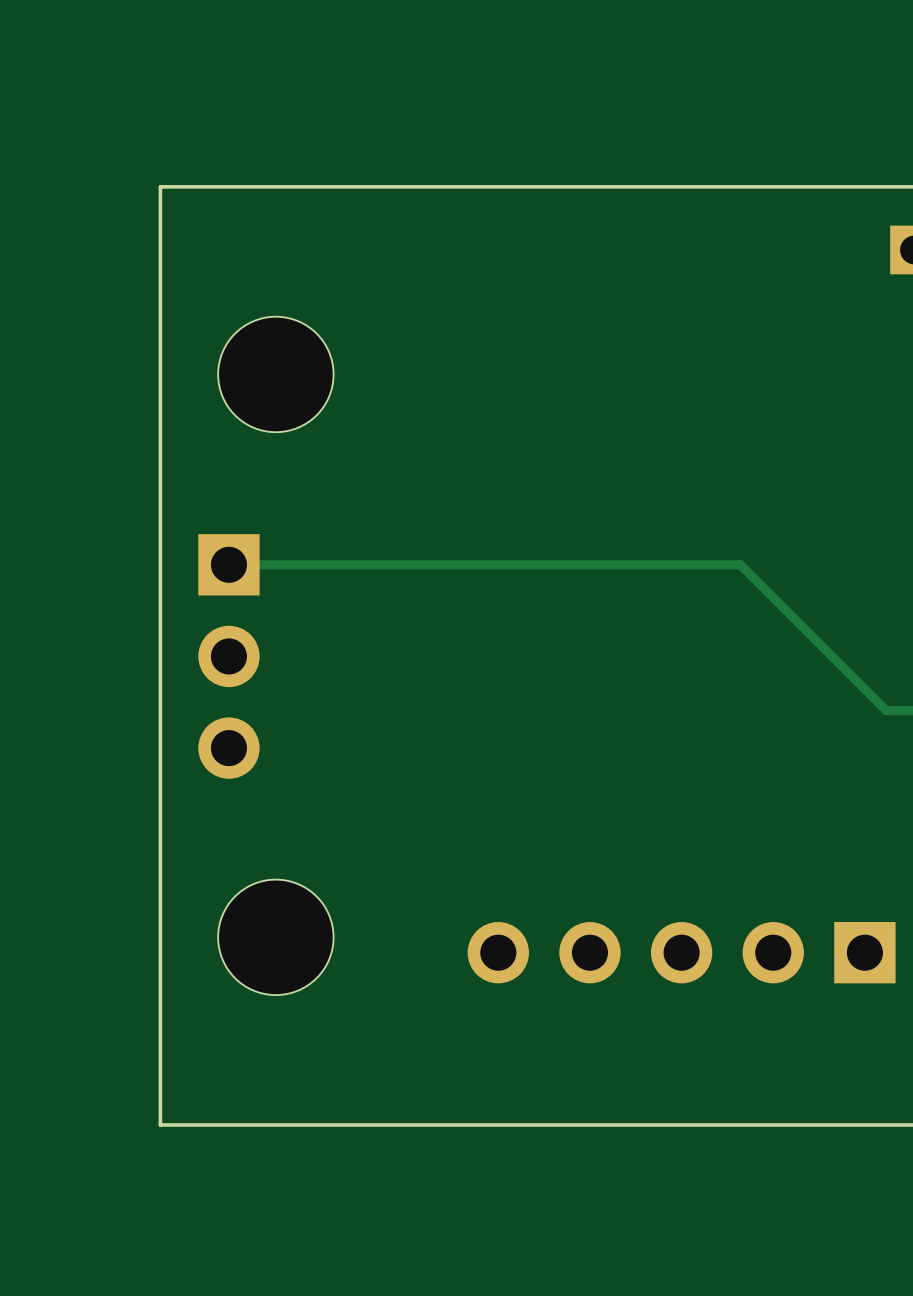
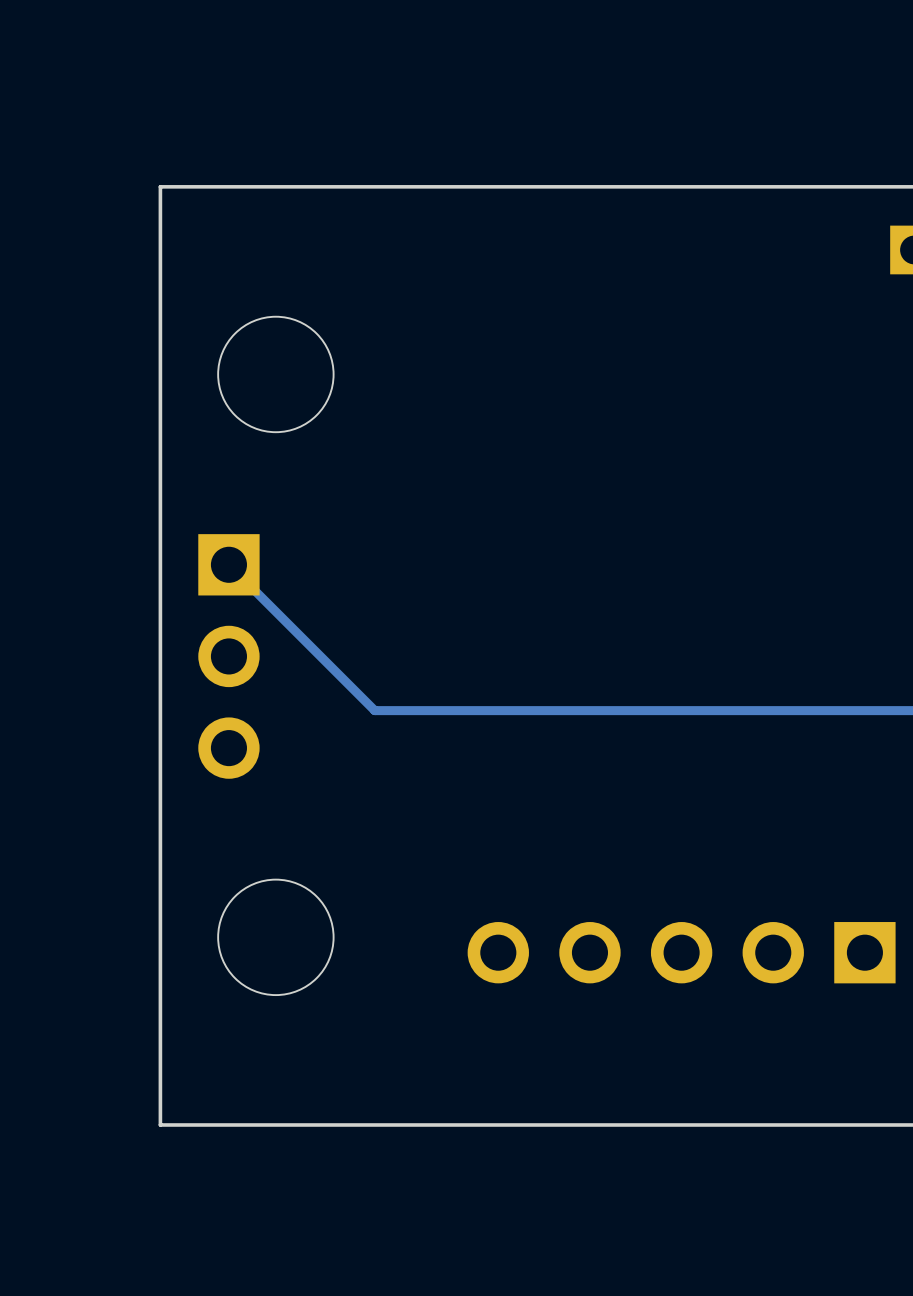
track: (228, 564) (740, 564) (886, 710) -> (228, 564) (374, 710) (886, 710)

